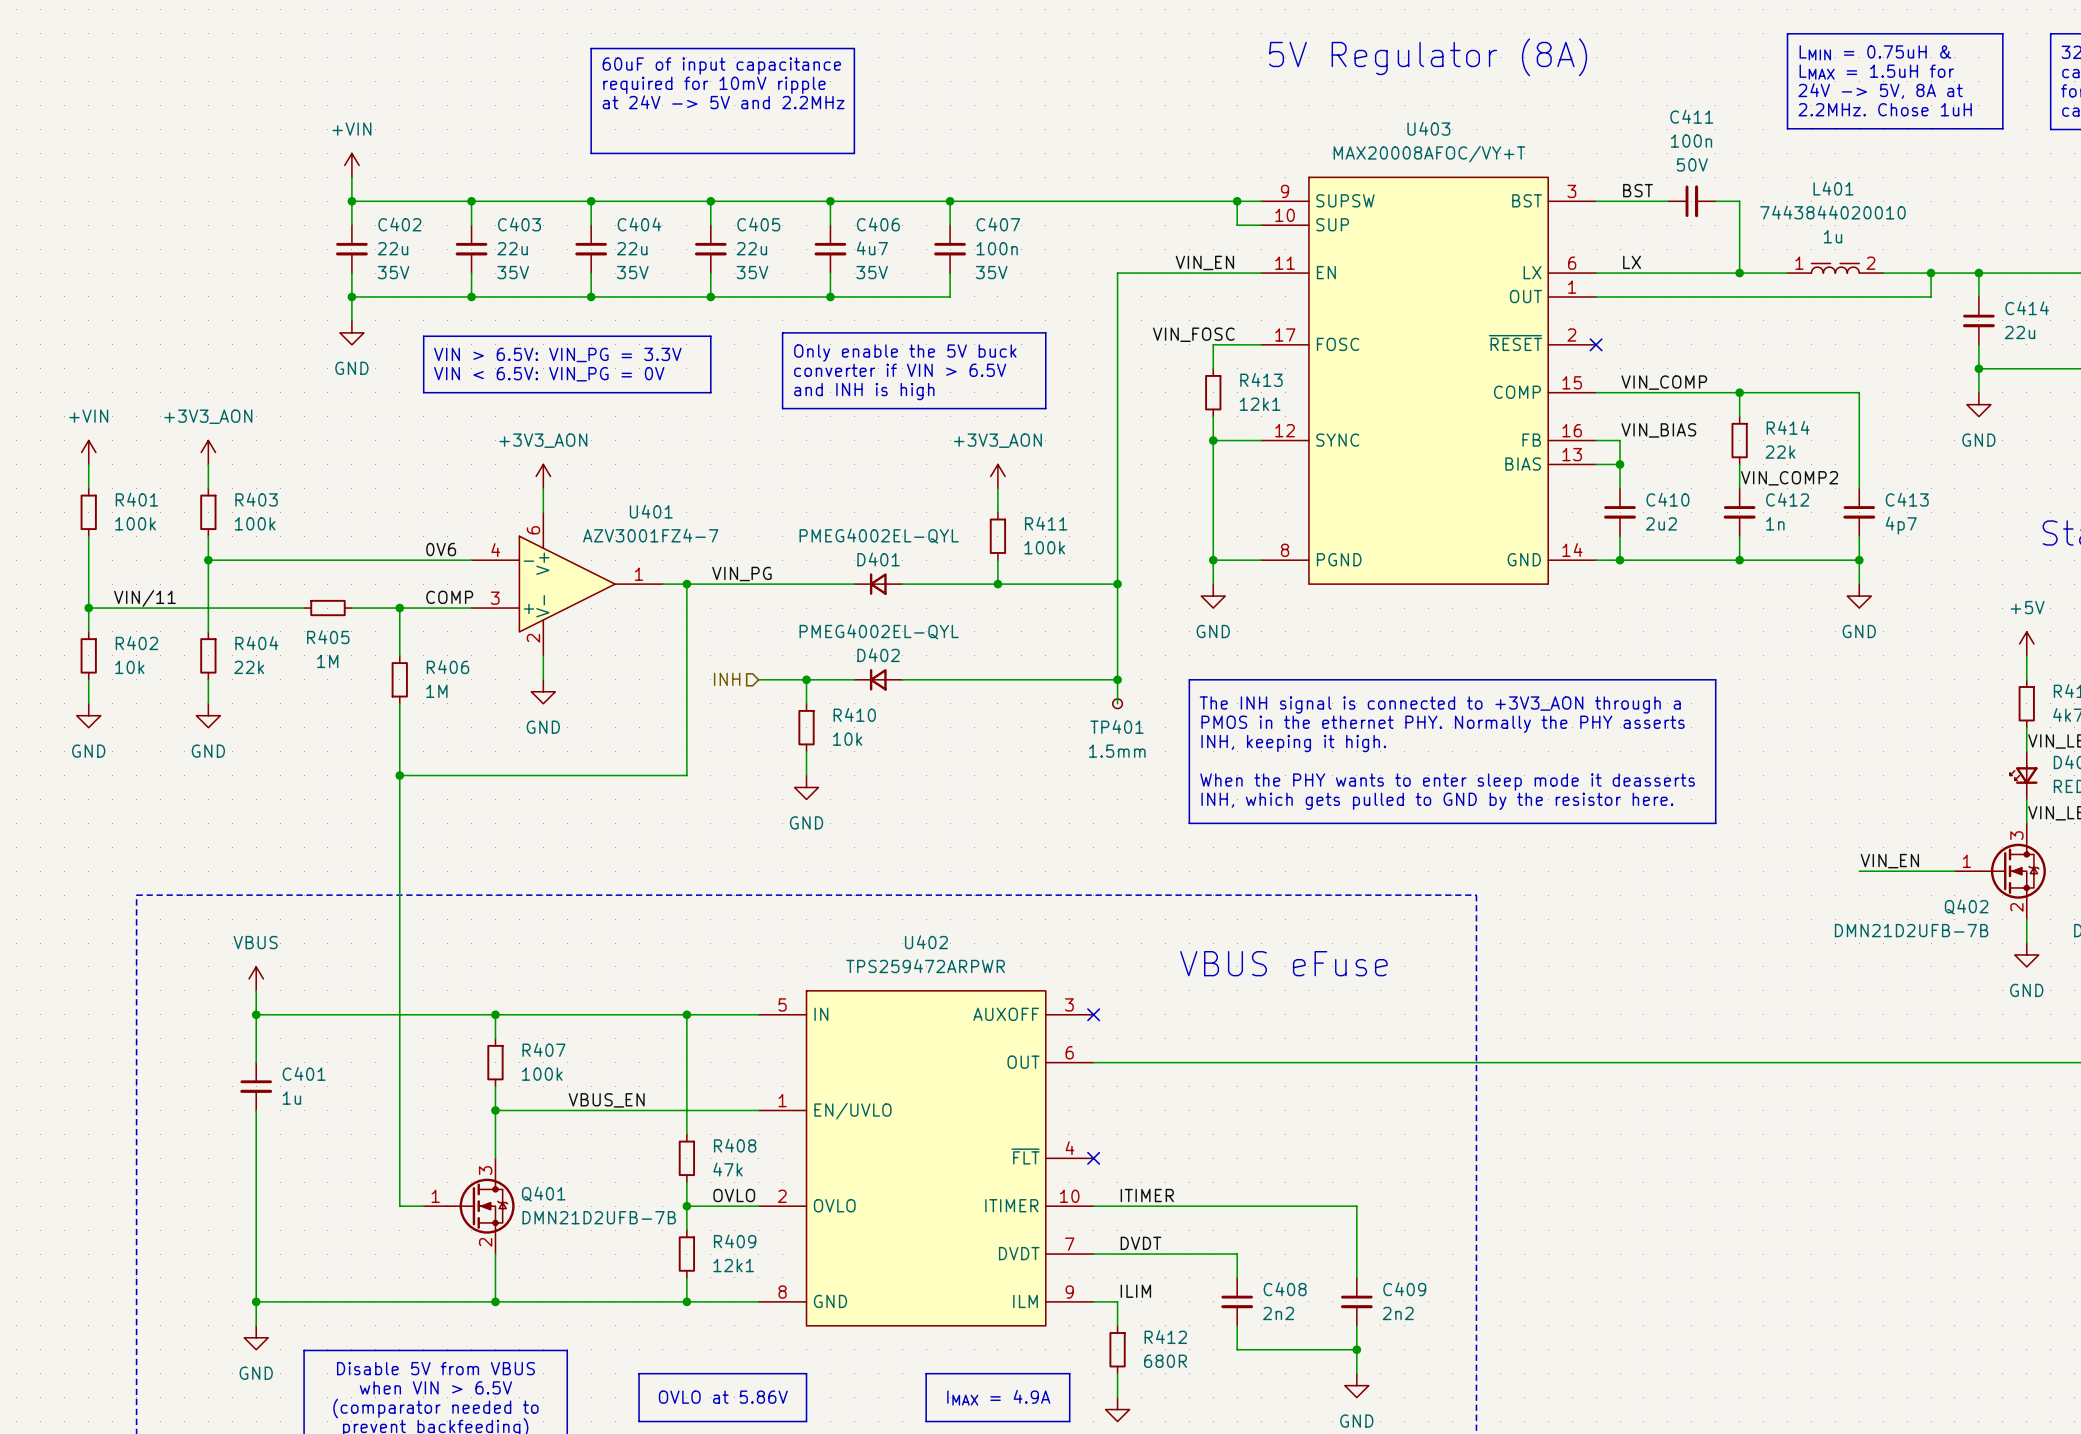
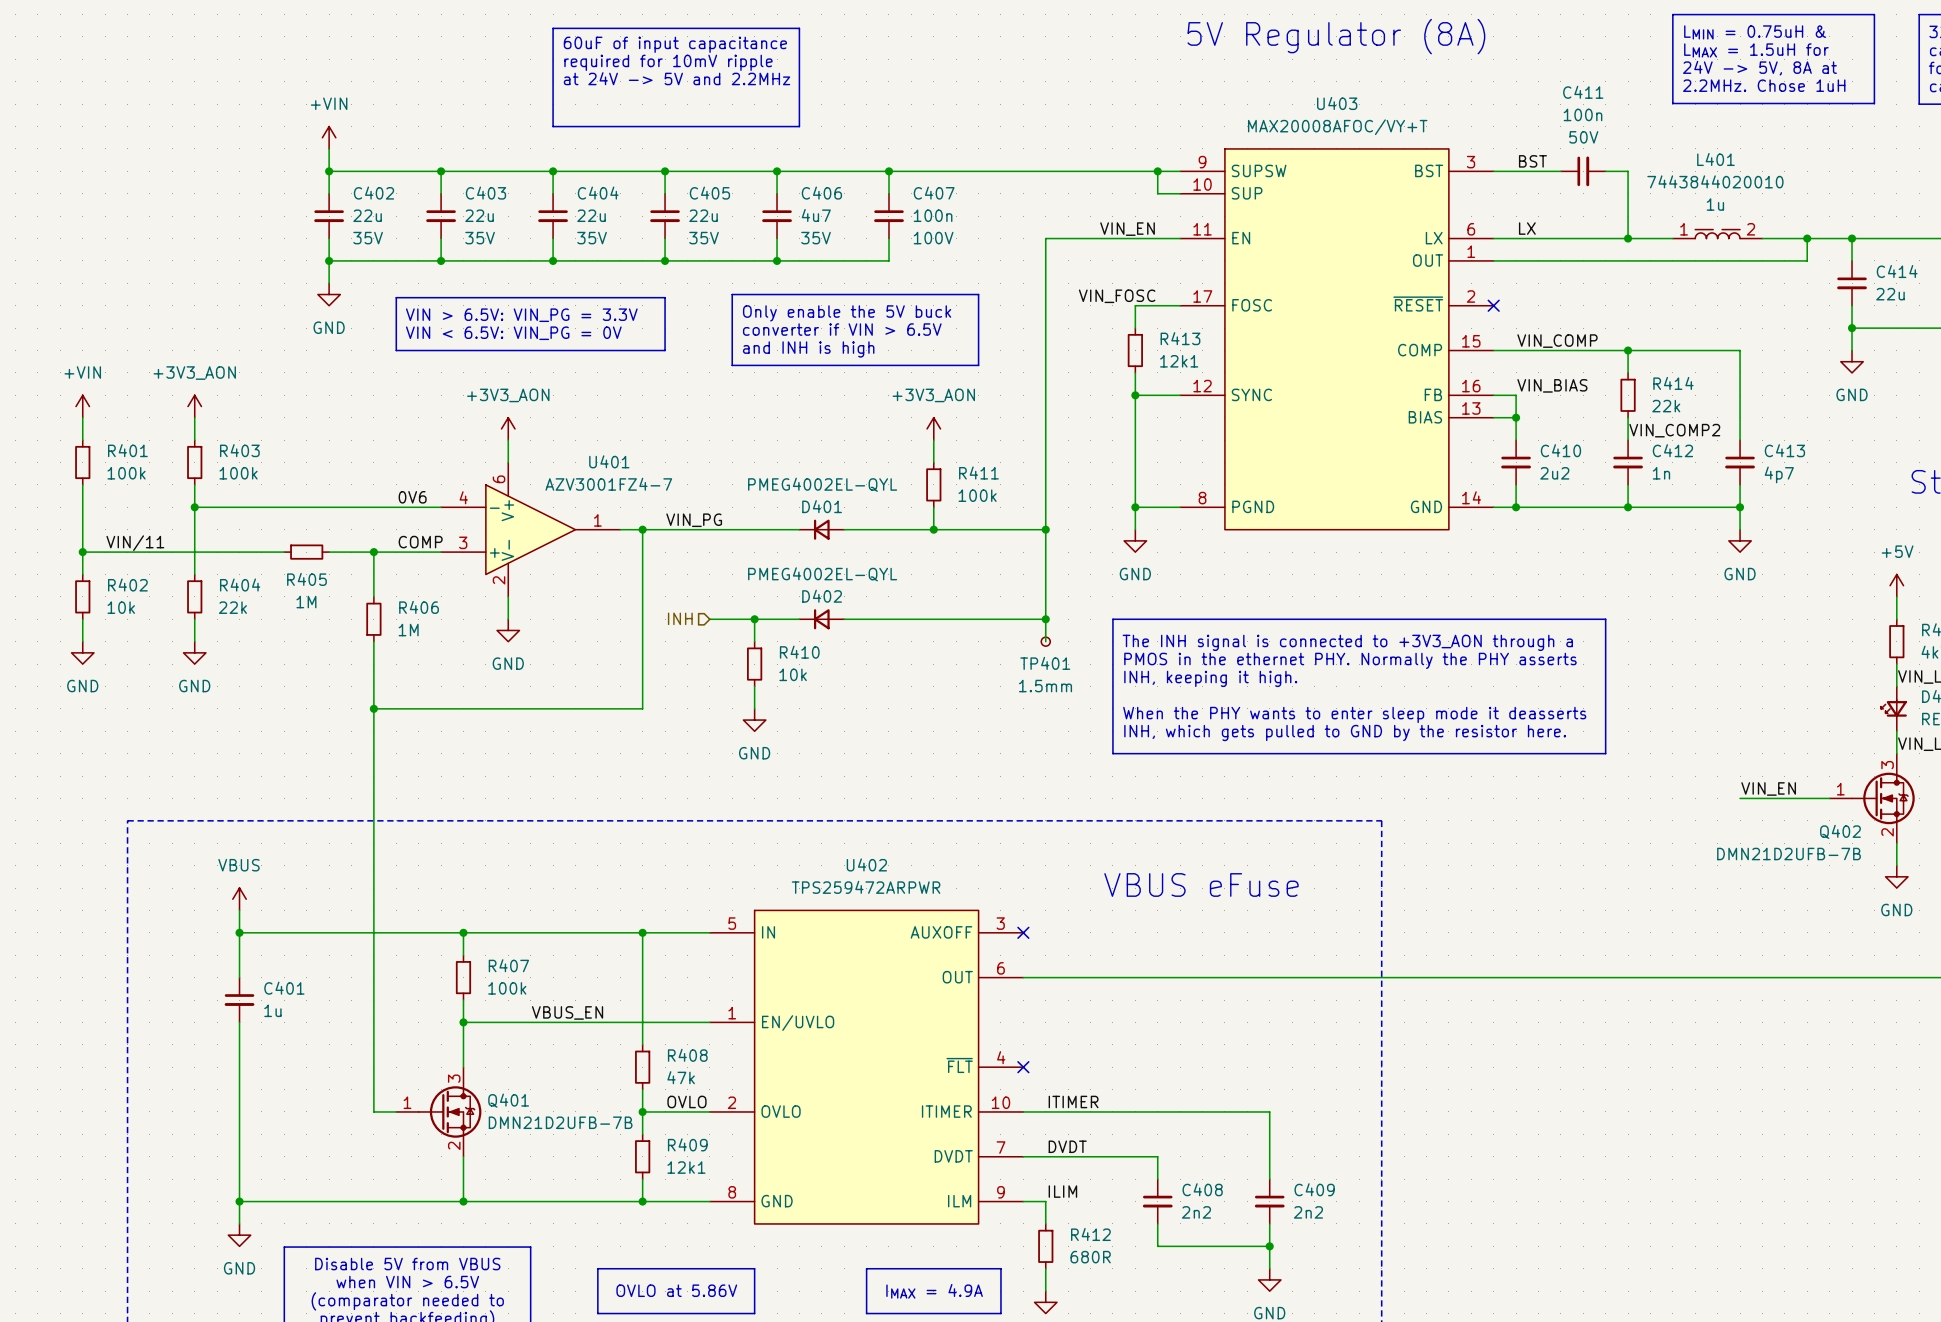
C407 text: 35V (991, 272) -> 100V (933, 238)

